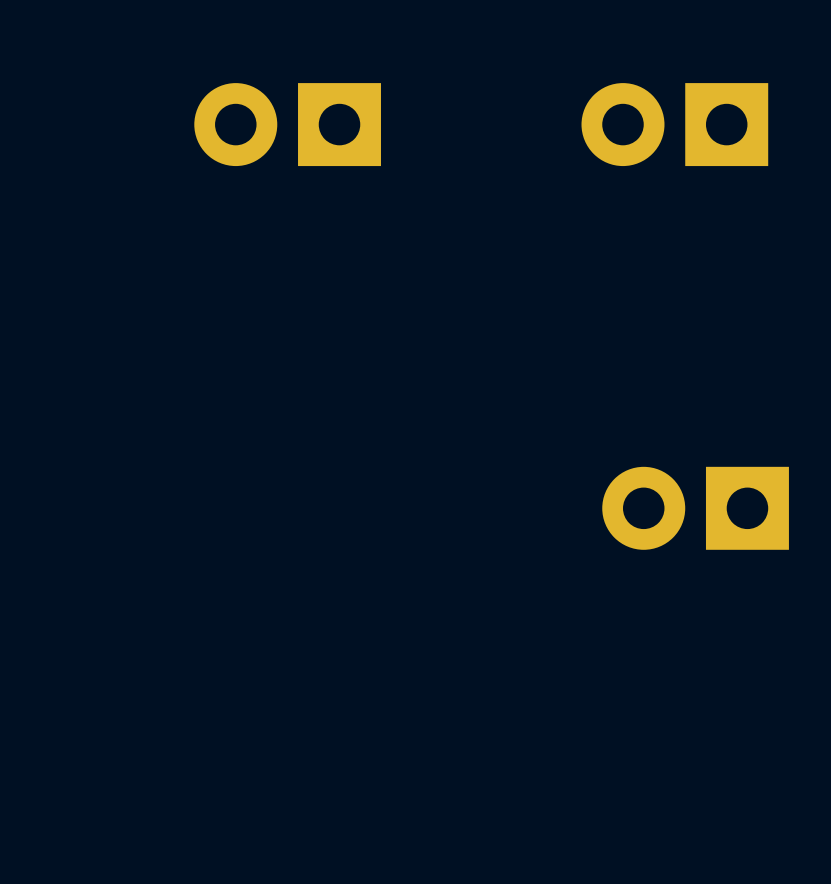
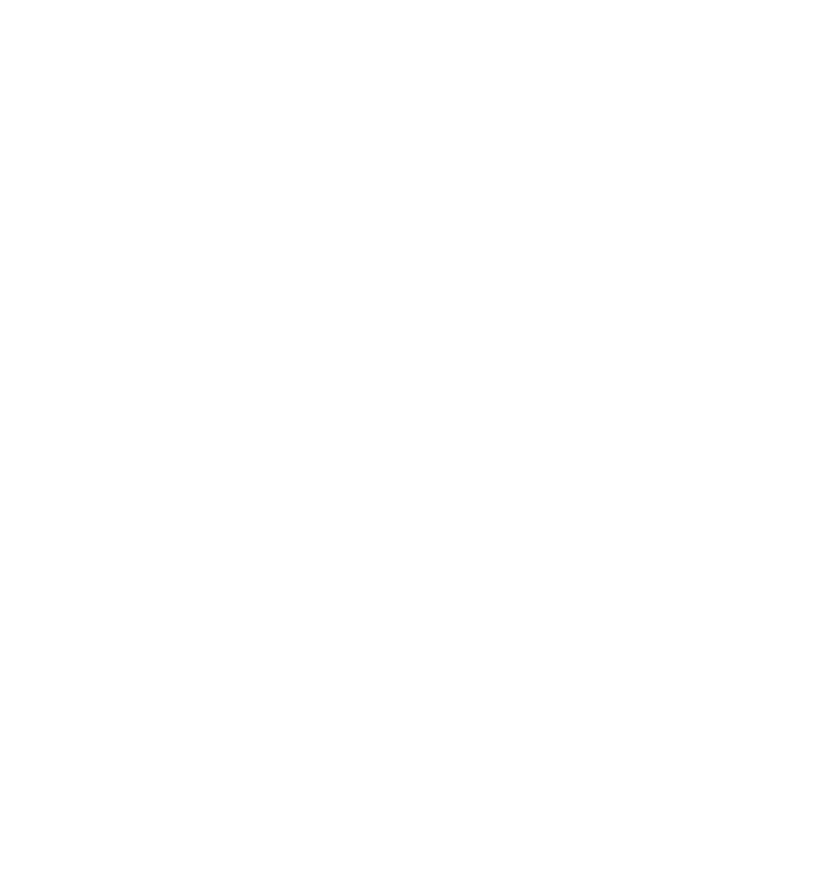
part: (287, 124) -> none
part: (674, 124) -> none
part: (695, 508) -> none

